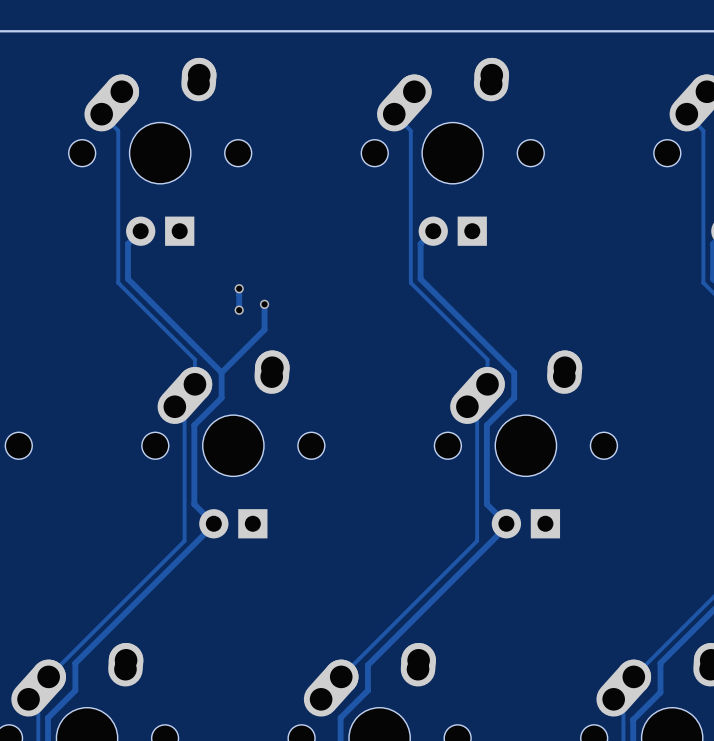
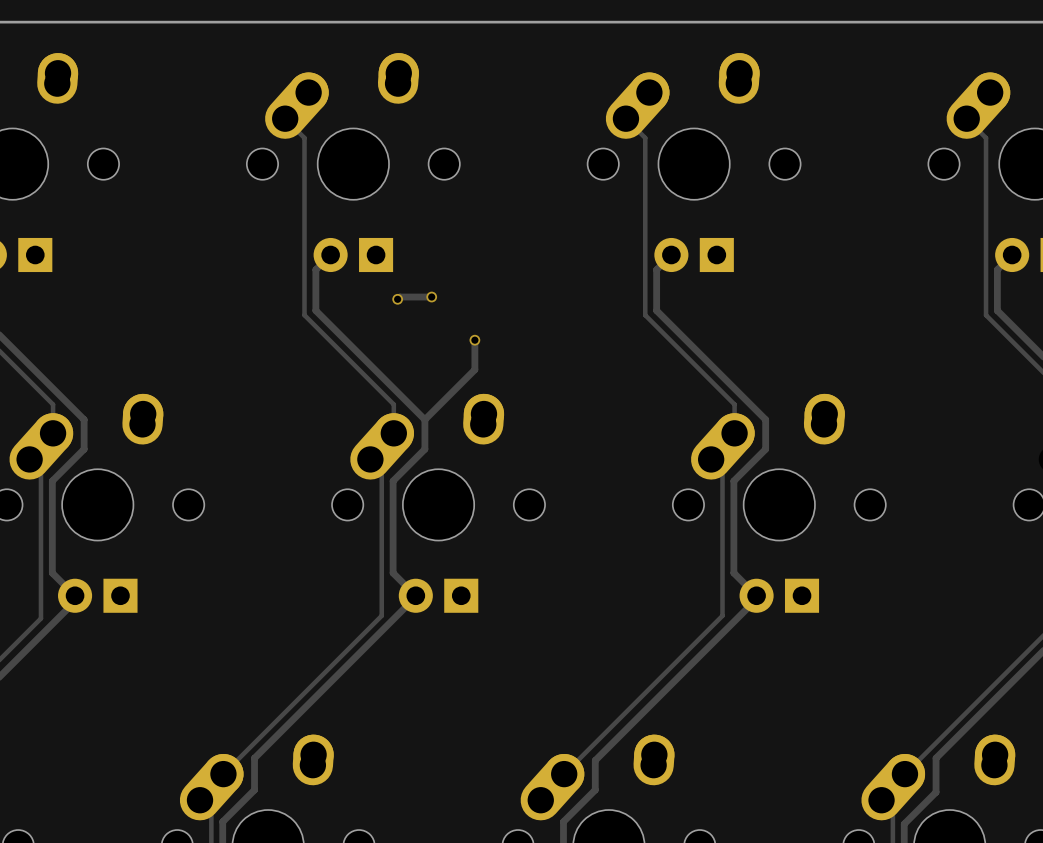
track: none -> (431, 297) (399, 297) (397, 299)
via: none -> (431, 297)
via: none -> (397, 299)
track: (239, 288) (239, 310) -> none
via: (239, 288) -> none
via: (239, 310) -> none

